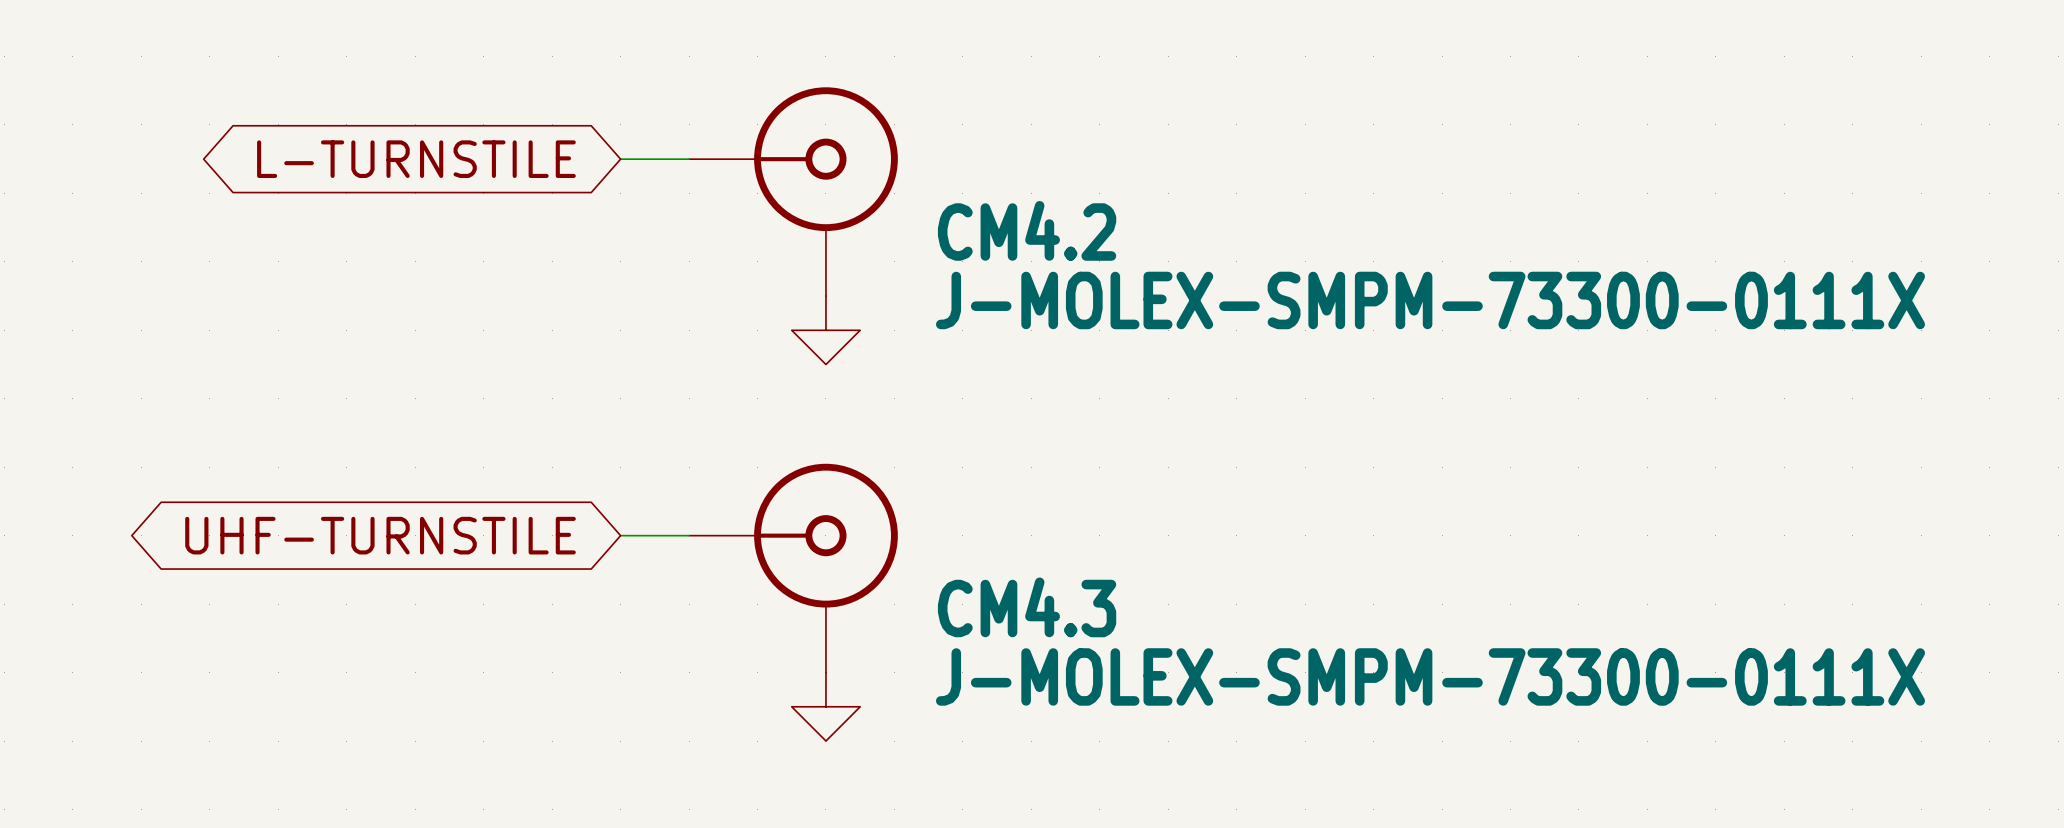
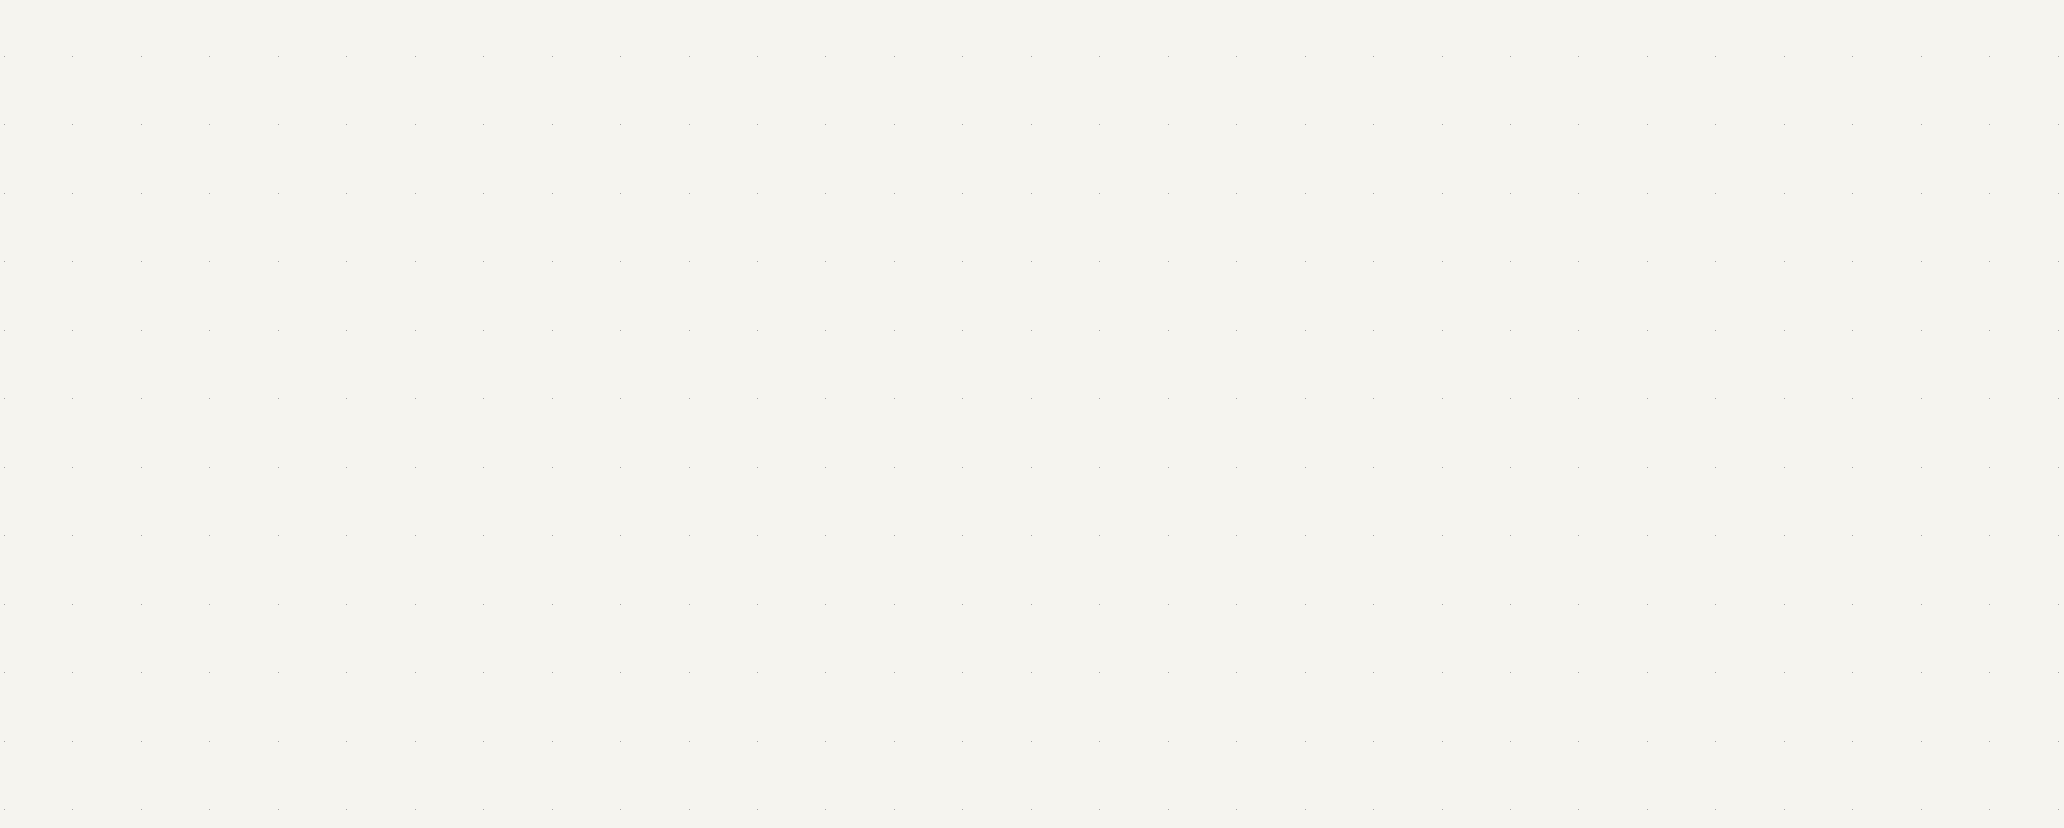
global label: L-TURNSTILE (416, 159) -> none
wire: (620, 159) (689, 159) -> none
CM4.2: J-MOLEX-SMPM-73300-0111X (793, 191) -> none
power symbol: (825, 330) -> none
global label: UHF-TURNSTILE (380, 535) -> none
wire: (620, 535) (689, 535) -> none
CM4.3: J-MOLEX-SMPM-73300-0111X (793, 568) -> none
power symbol: (825, 706) -> none

